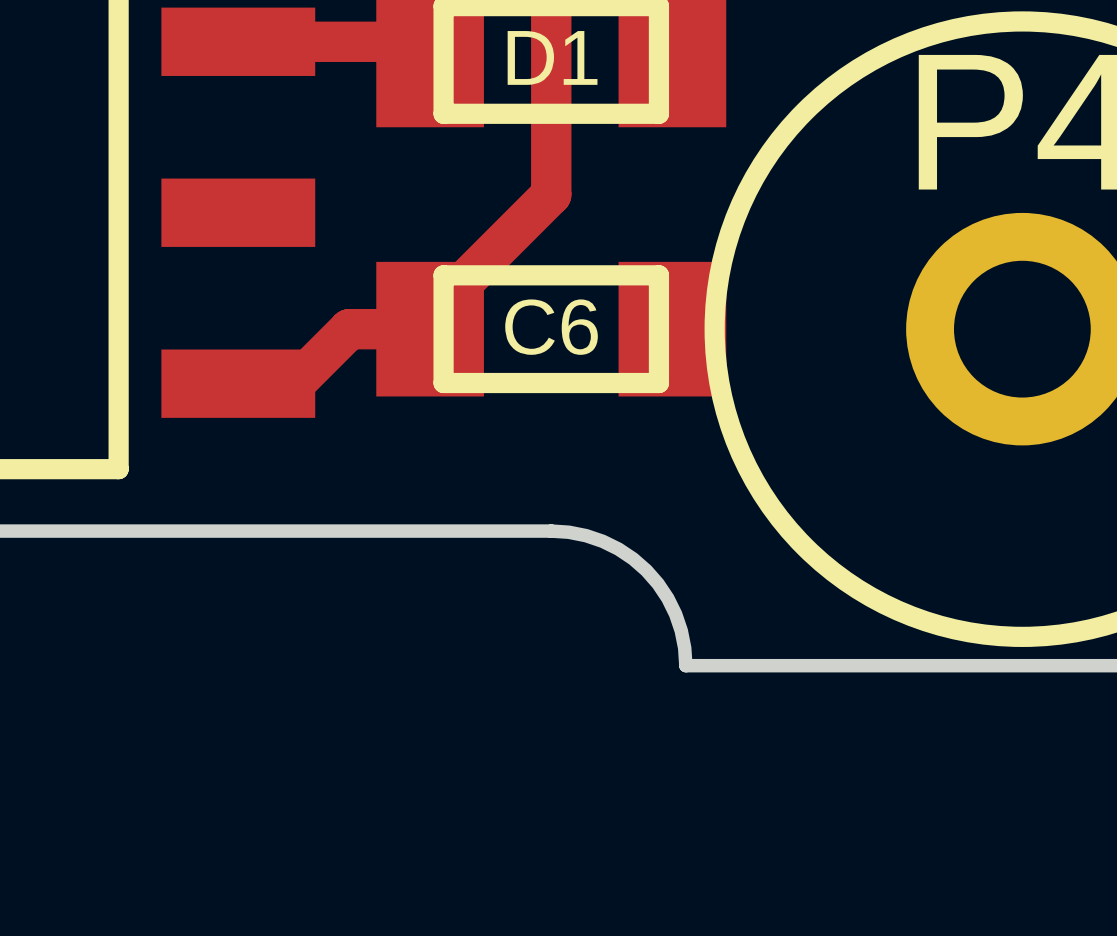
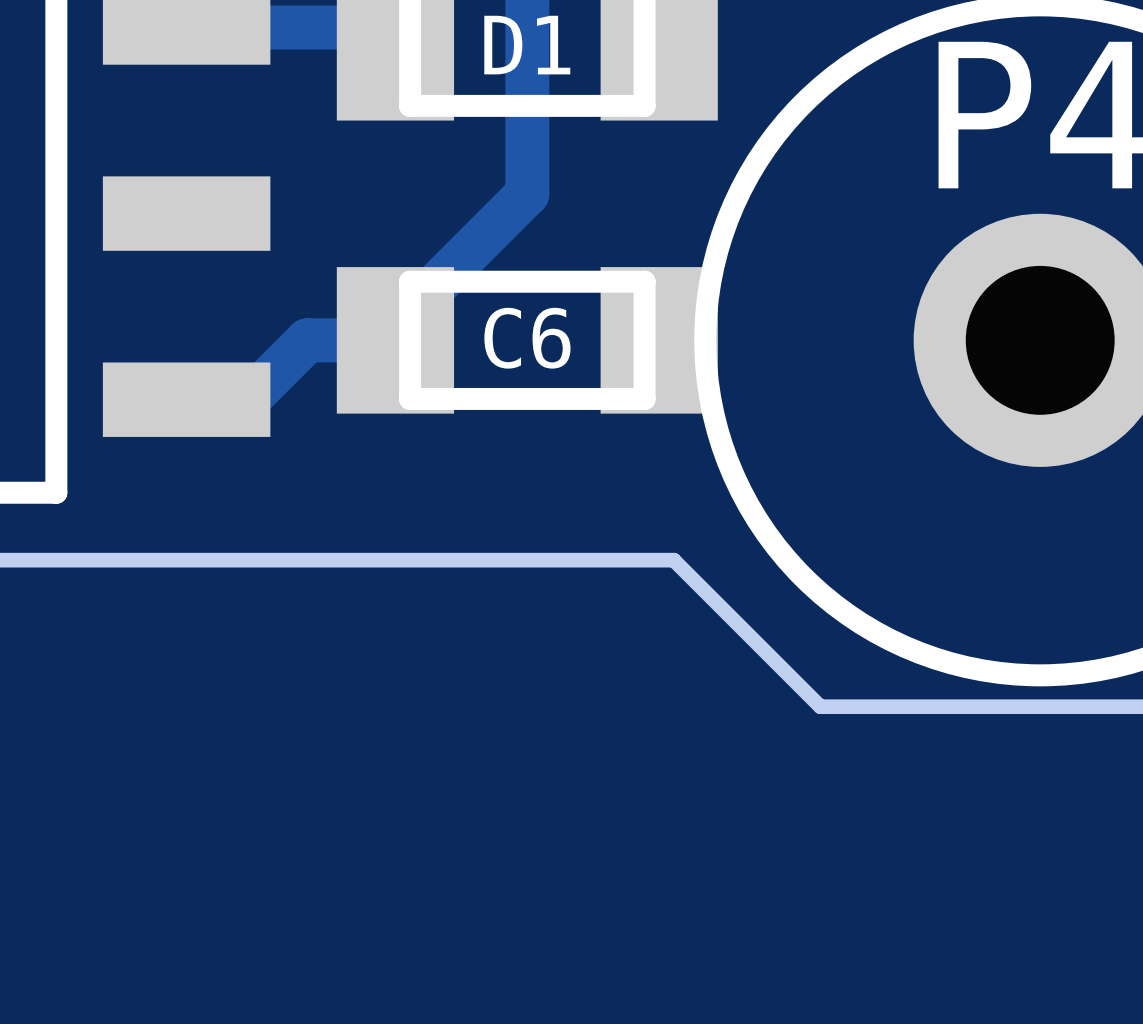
board edge: (551, 531) (568, 532) (602, 541) (633, 558) (646, 570) (667, 598) (675, 614) (684, 648) (685, 665) (820, 665) -> (527, 560) (673, 560) (820, 706)

